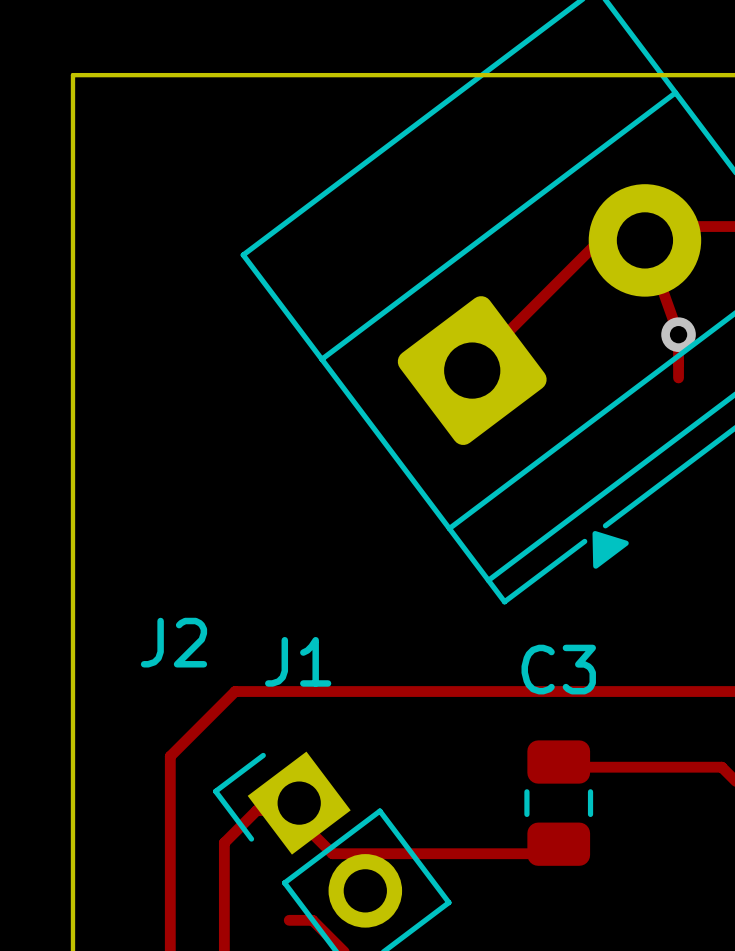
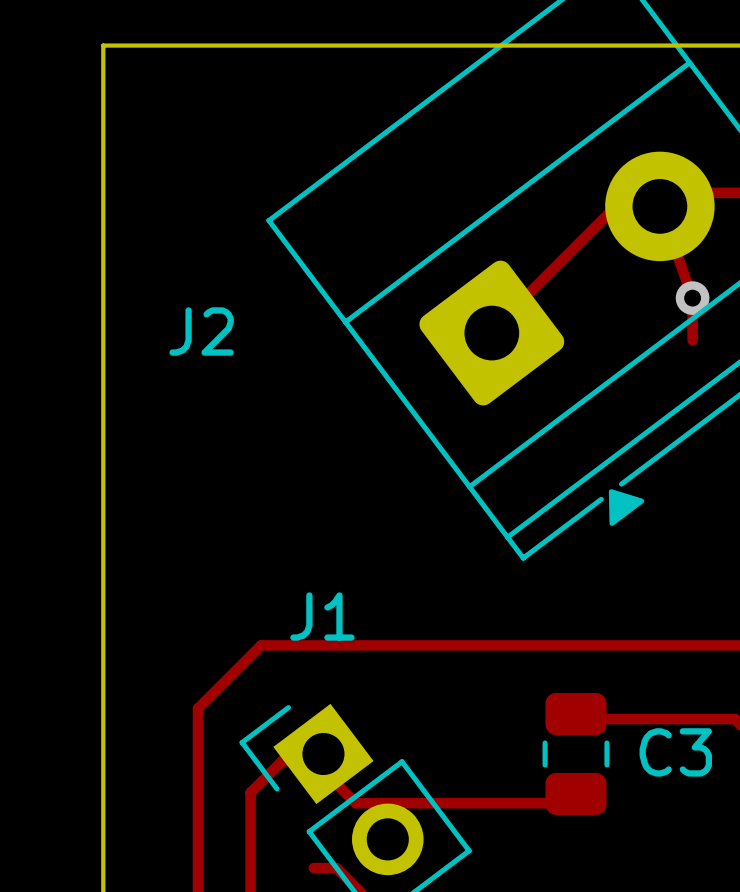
J2 name position: J2 (173, 642) -> J2 (201, 331)
C3 name position: C3 (558, 669) -> C3 (675, 752)

